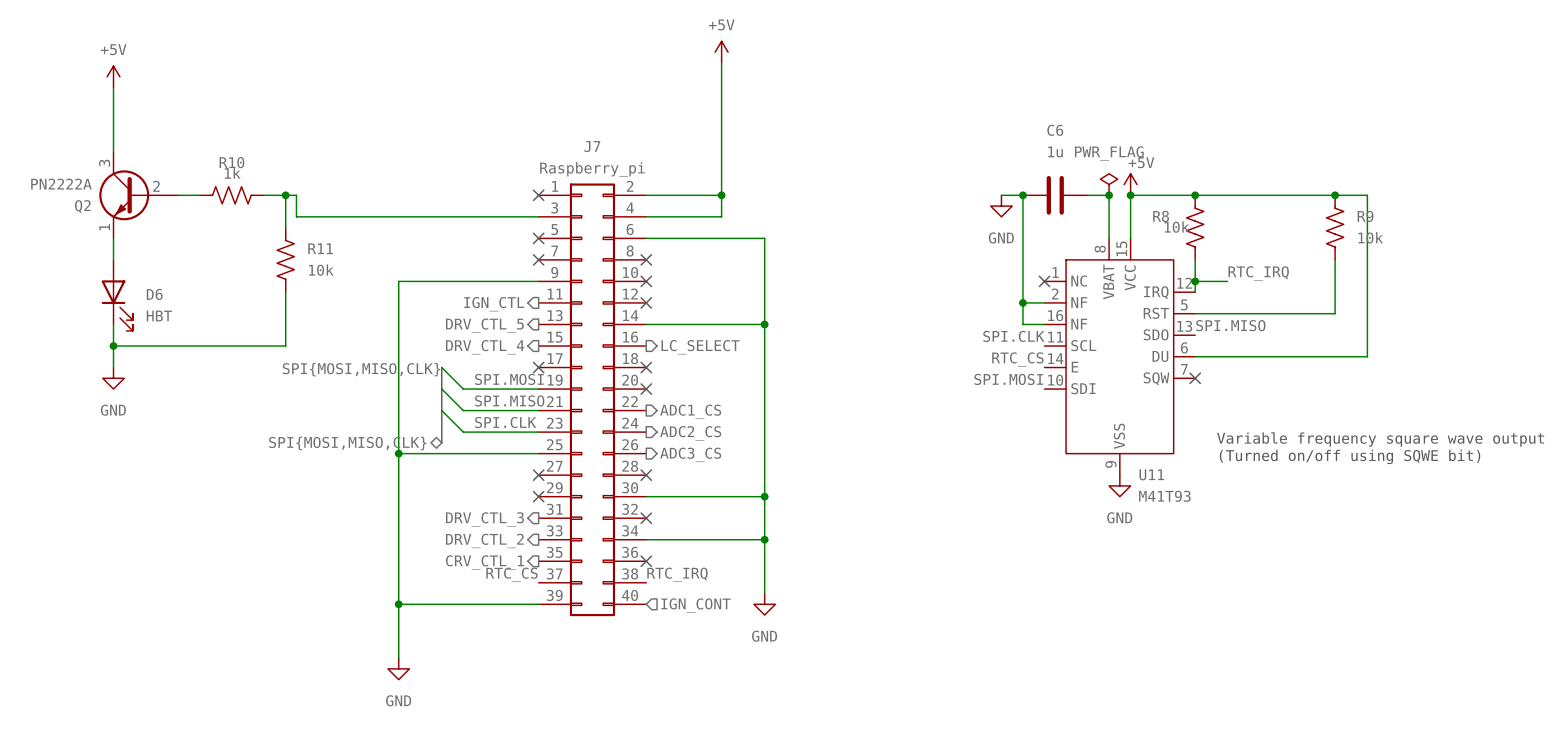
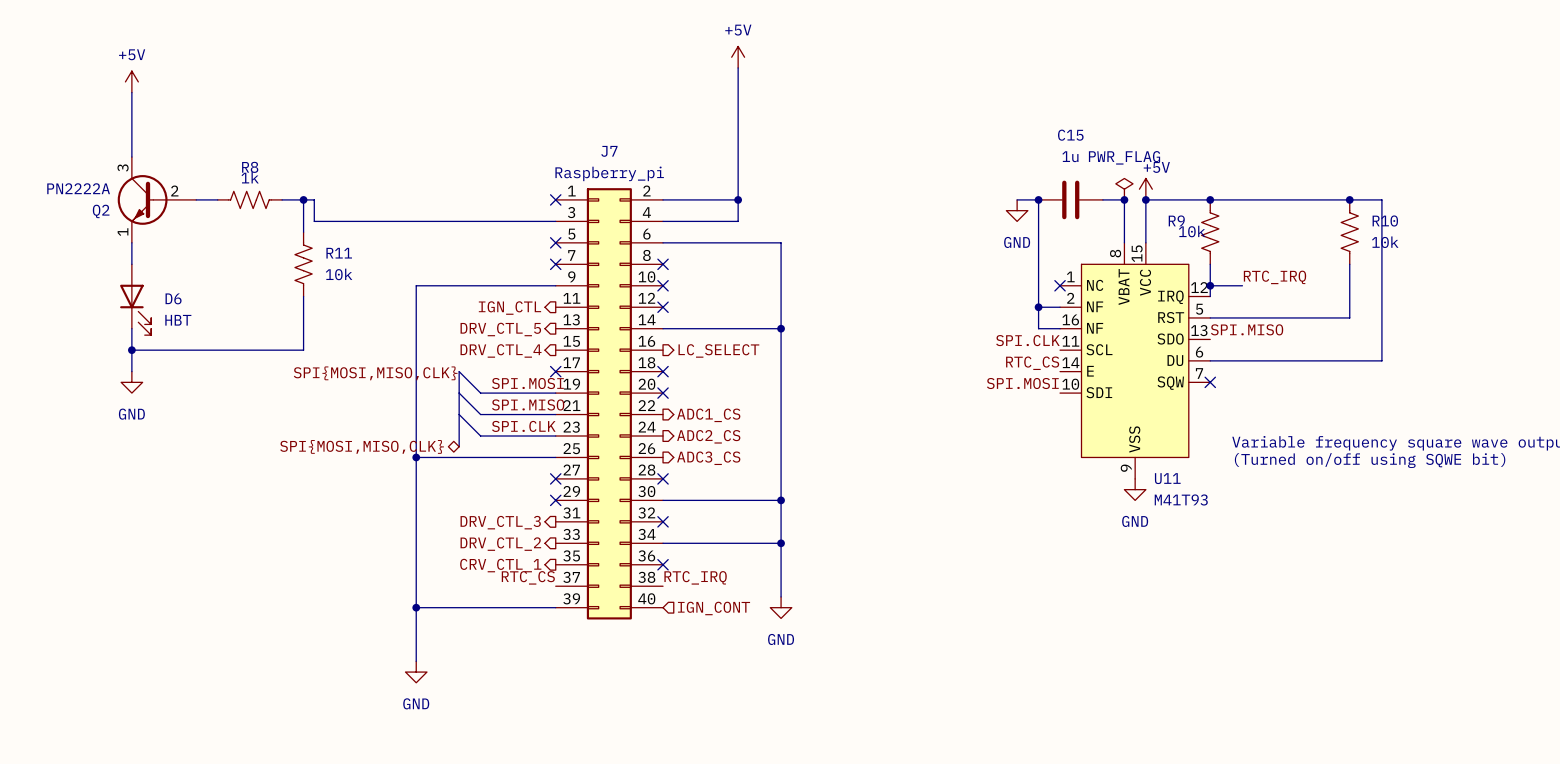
C6 name: C6 (1055, 130) -> C15 (1070, 135)
R10 name: R10 (231, 162) -> R8 (250, 167)
R8 name: R8 (1161, 216) -> R9 (1176, 220)
R9 name: R9 (1365, 216) -> R10 (1385, 221)

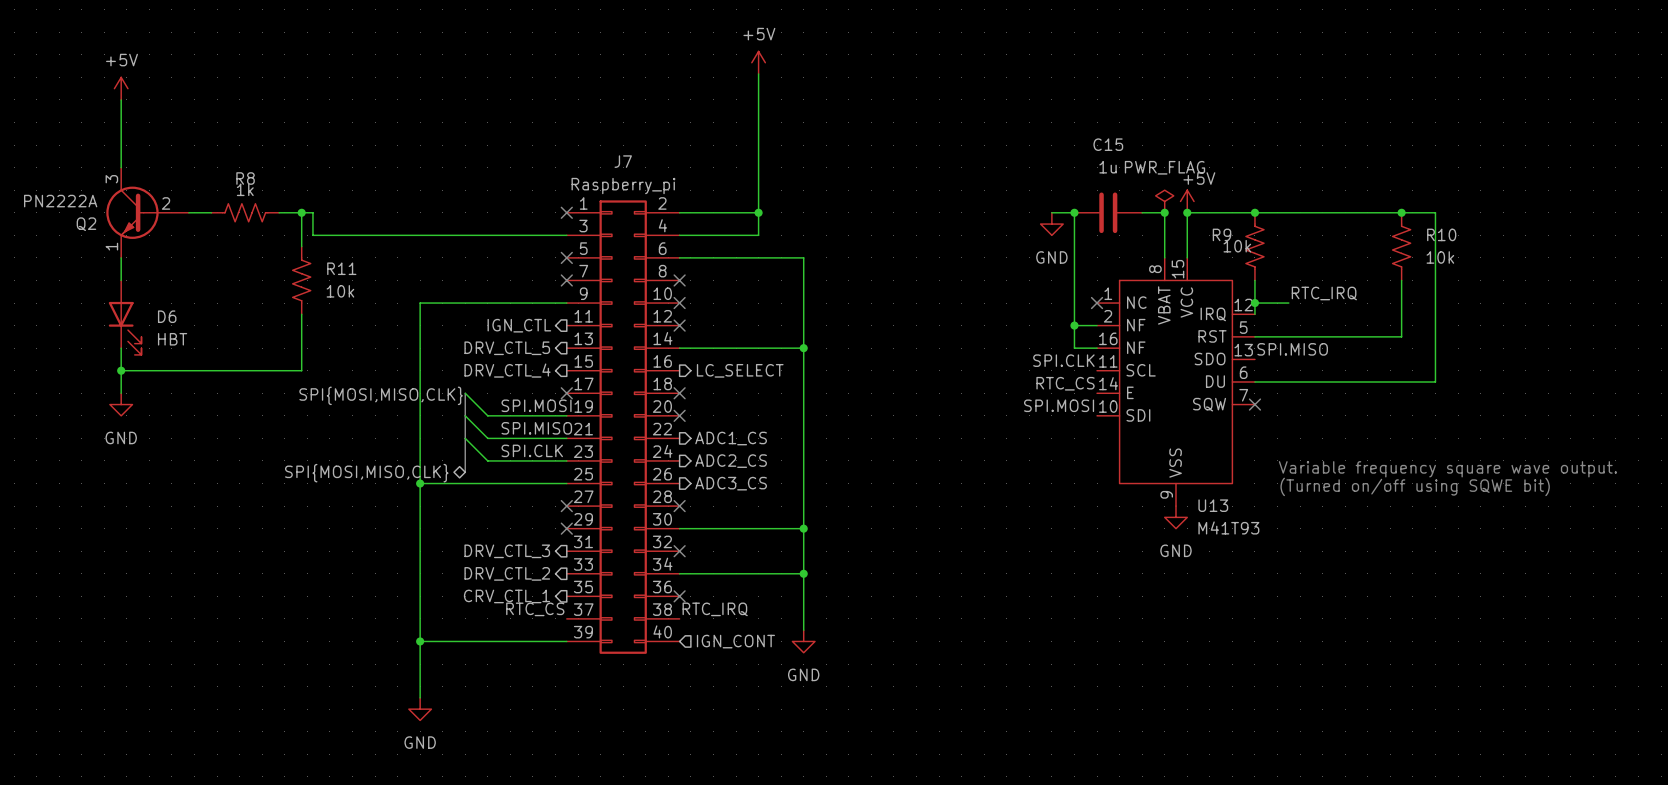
U11 name: U11 (1167, 478) -> U13 (1213, 505)

